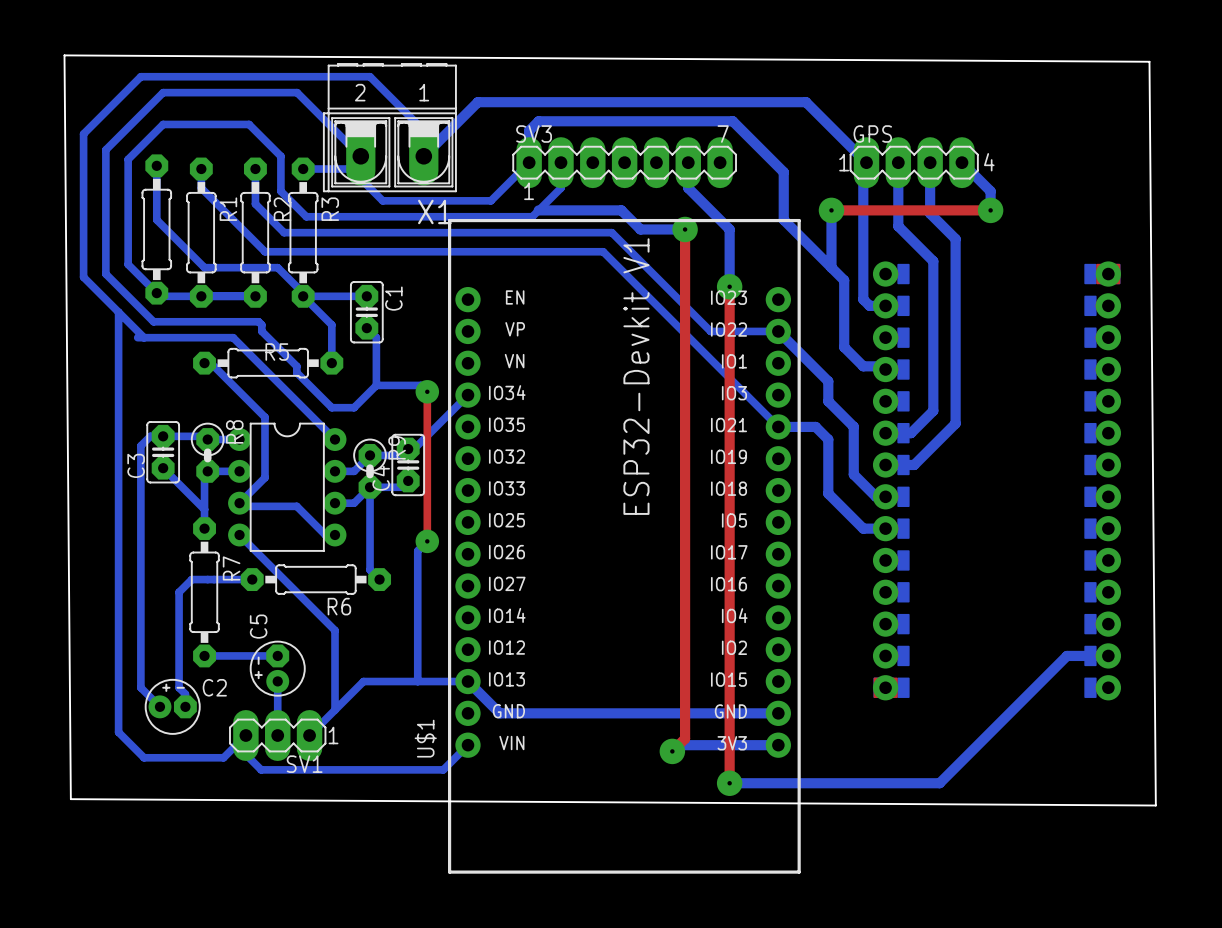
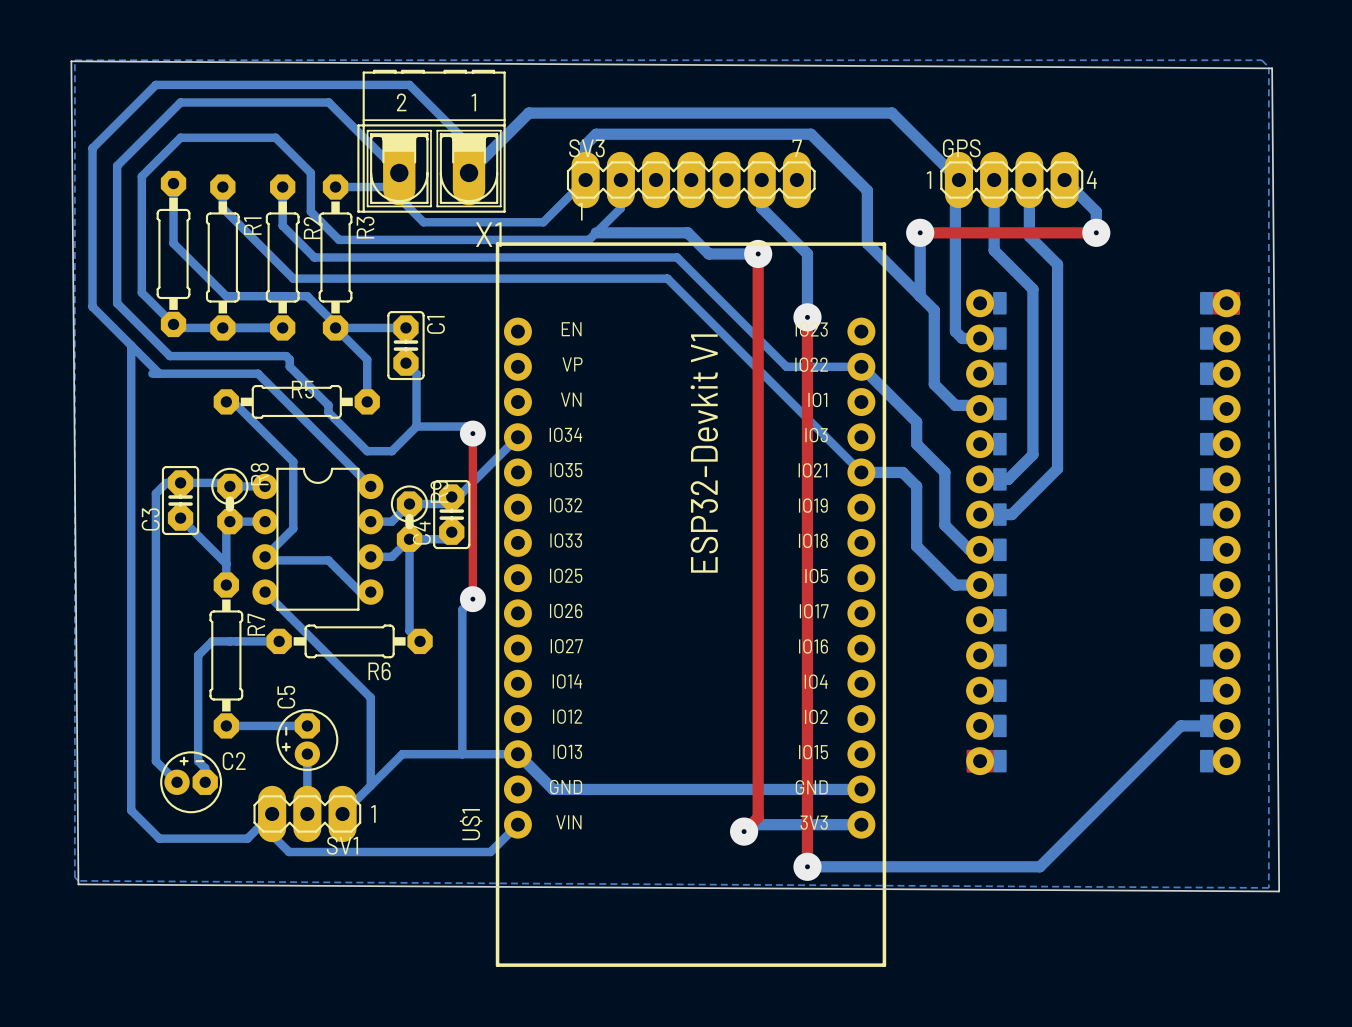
bottom zone outline: none -> (74, 60) (74, 877) (78, 880) (1268, 887) (1268, 67) (1261, 60) (74, 60)

